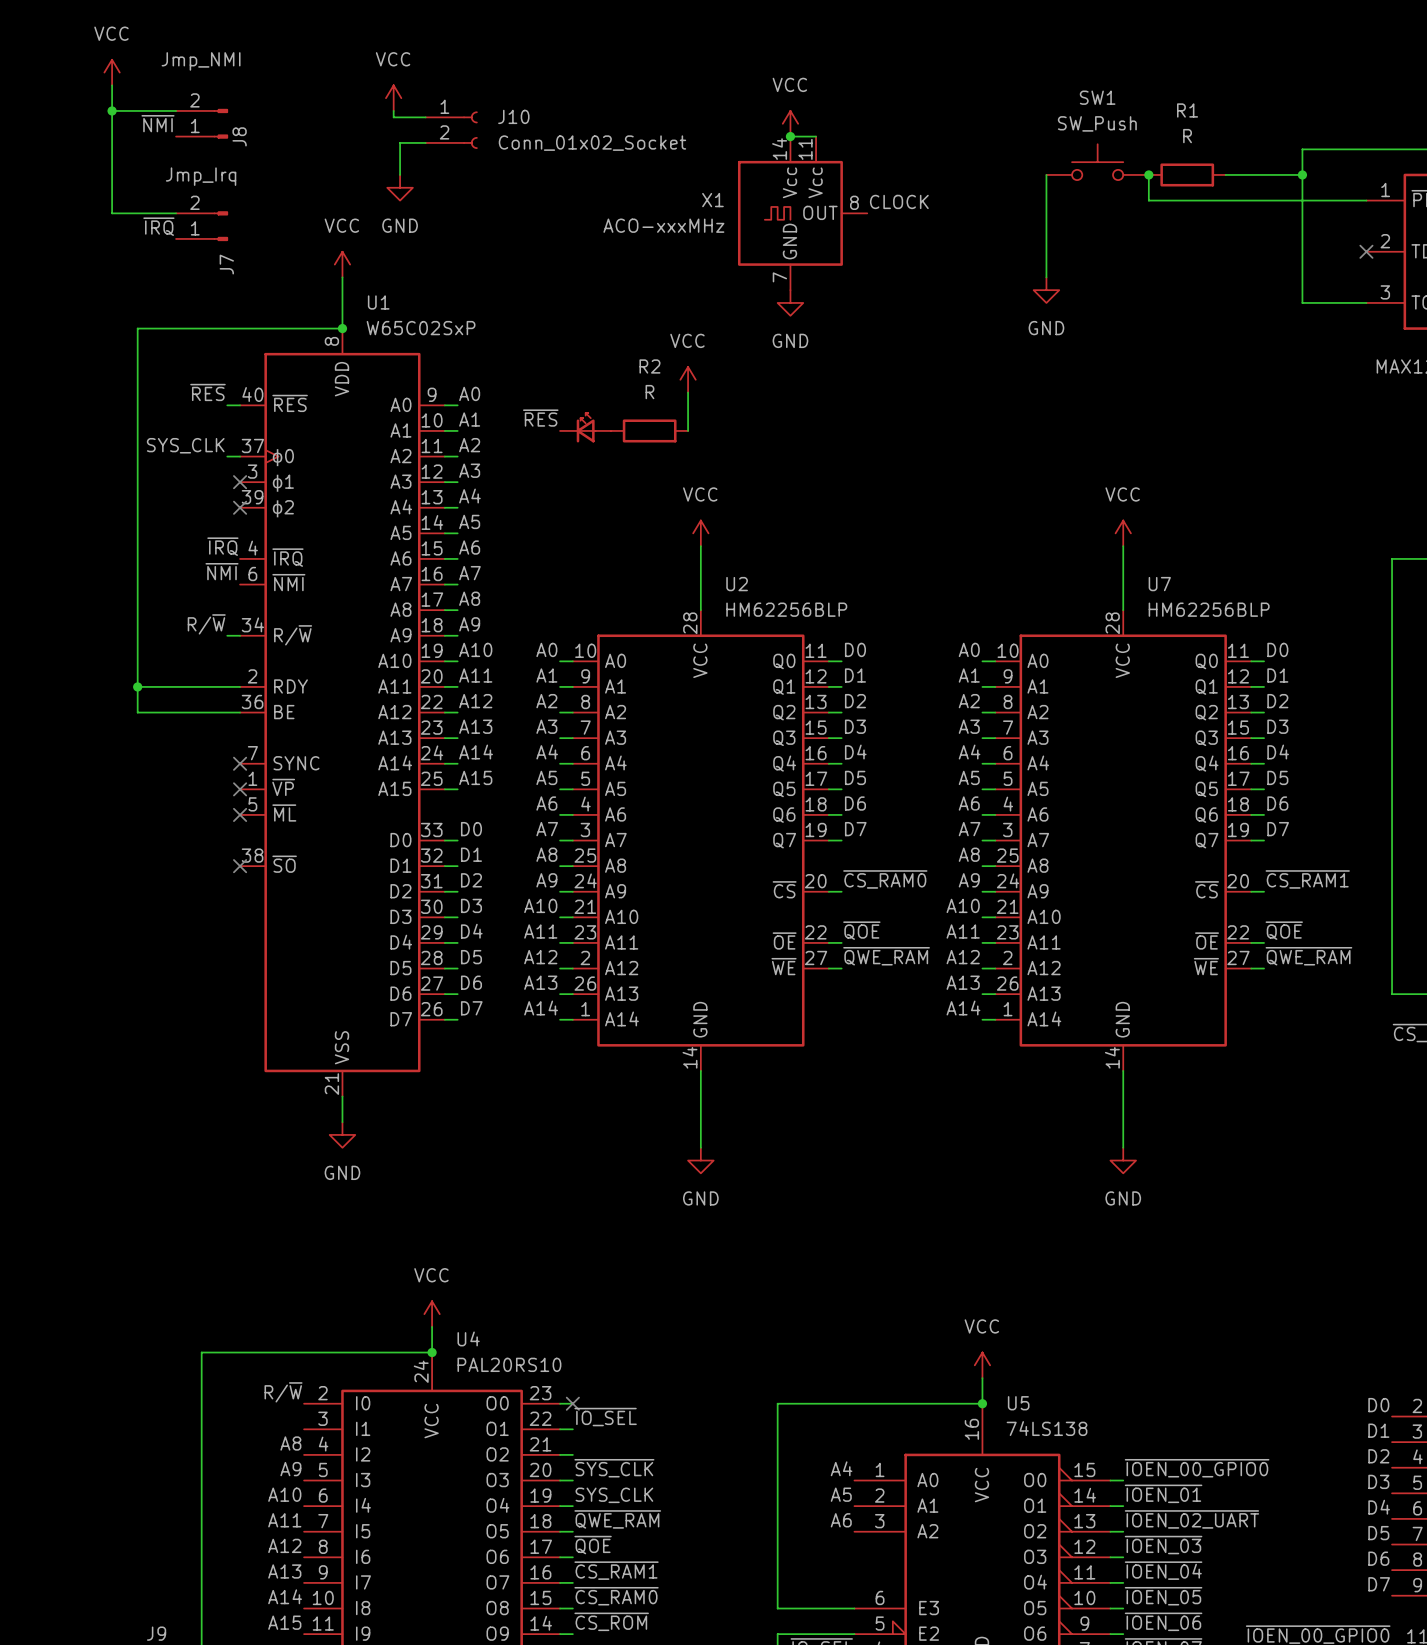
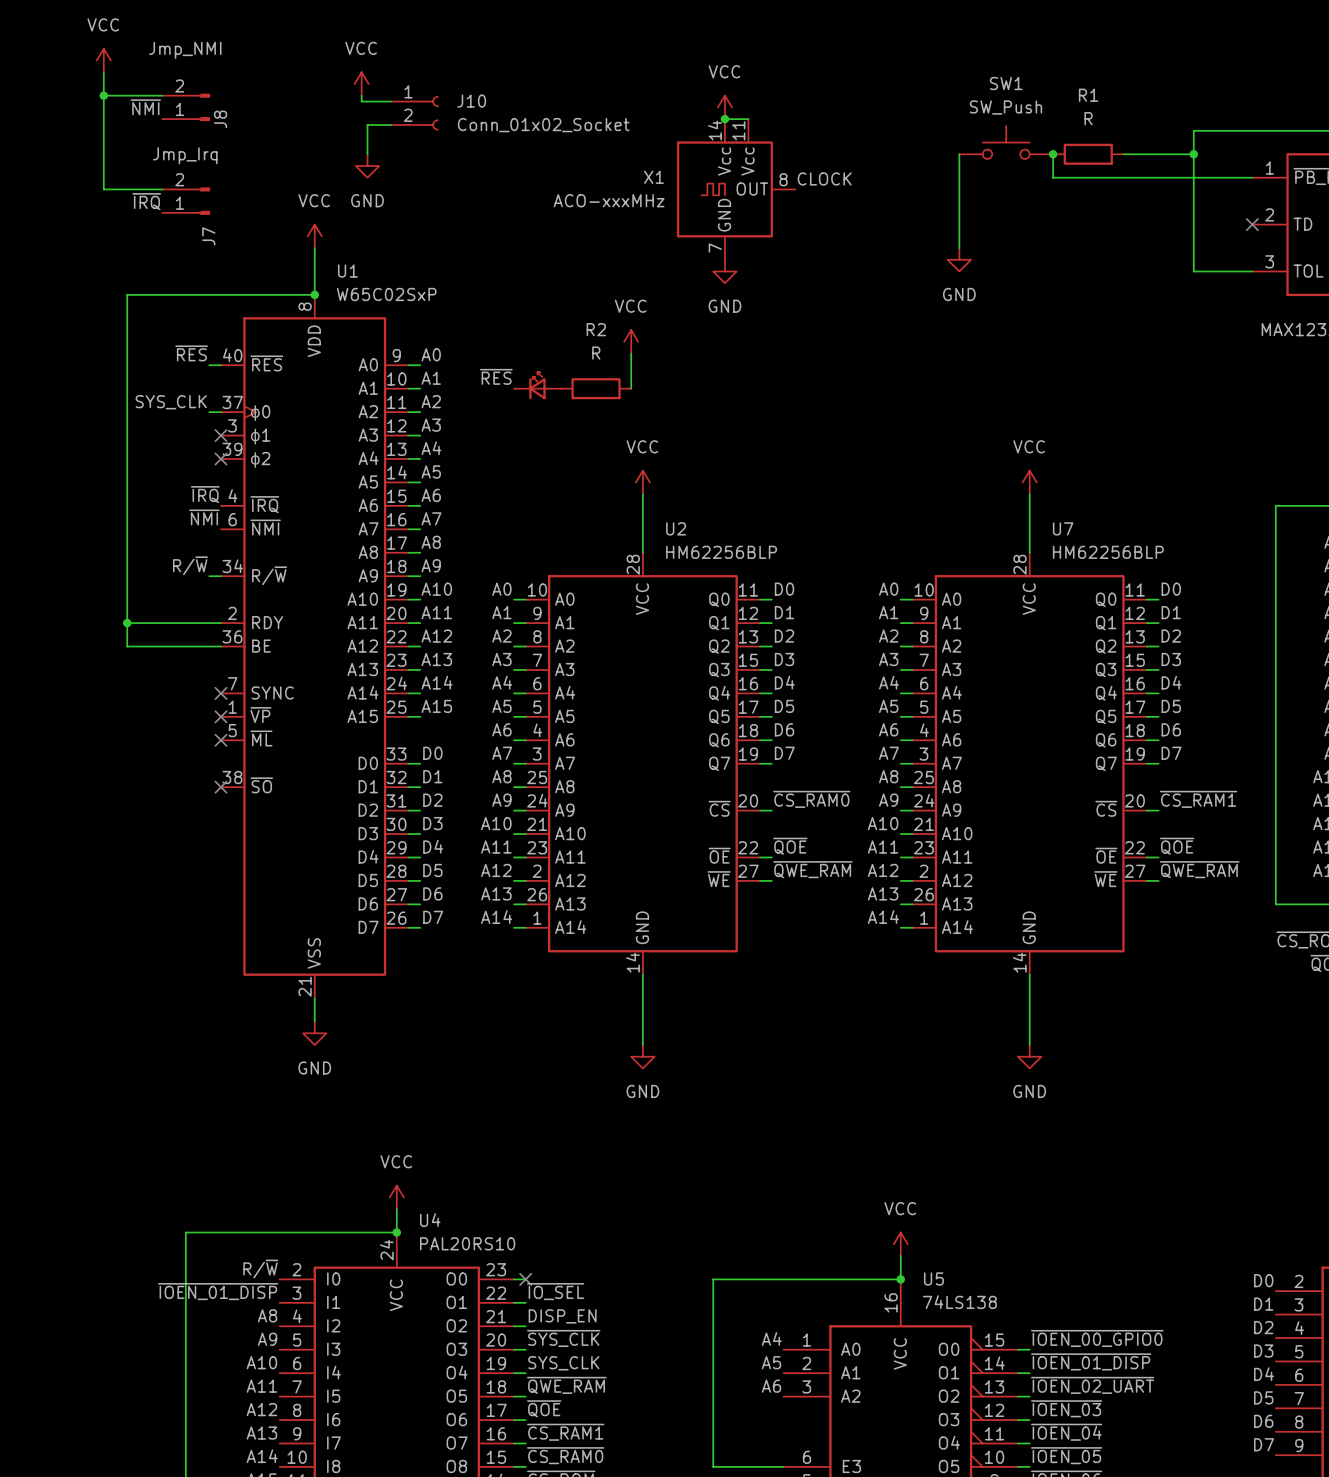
label: none -> ~{IOEN_01_DISP} (218, 1291)
label: none -> DISP_EN (562, 1316)
label: ~{IOEN_01} (1163, 1493) -> ~{IOEN_01_DISP} (1091, 1361)

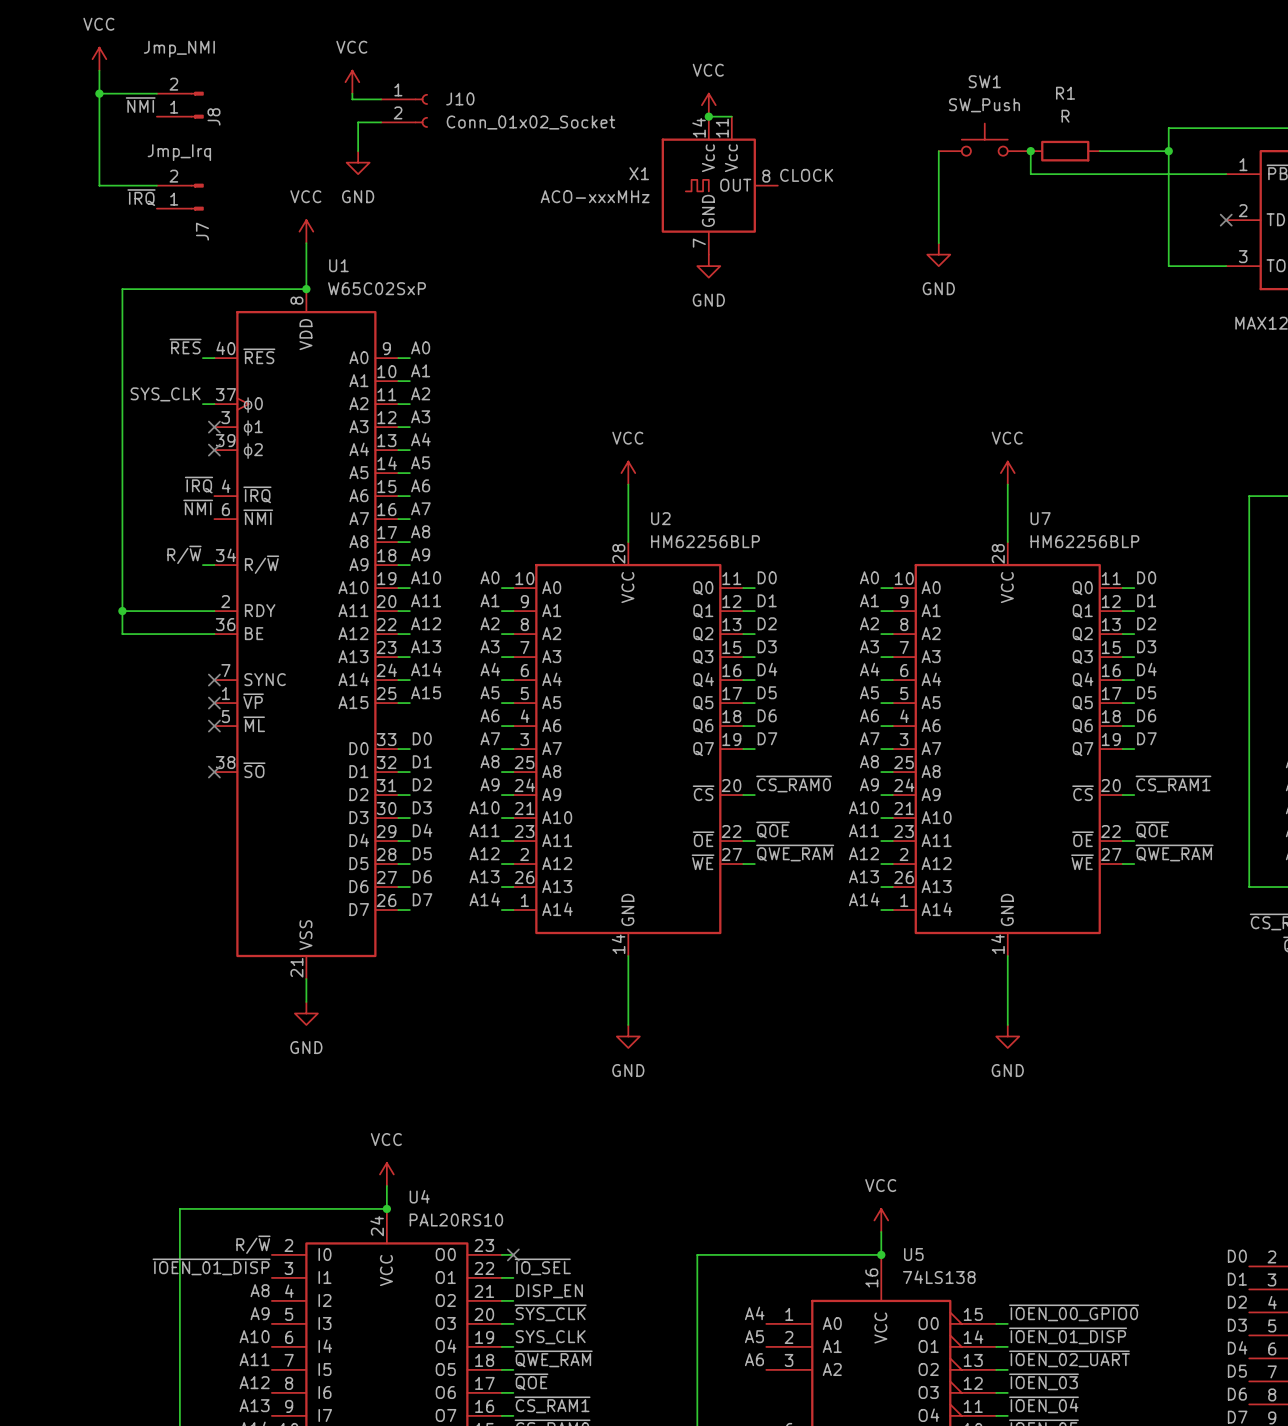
power symbol: VCC (631, 341) -> none
wire: (631, 353) (631, 388) -> none
label: ~{RES} (496, 376) -> none
part: (537, 385) -> none
R2: R (596, 388) -> none

